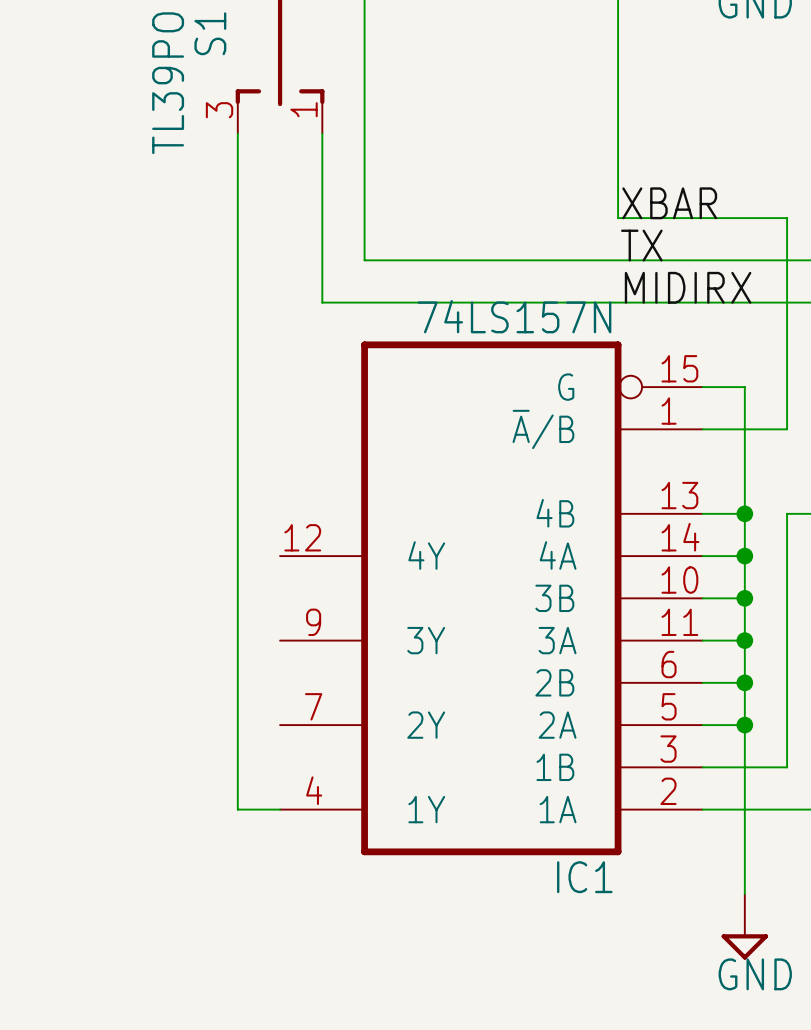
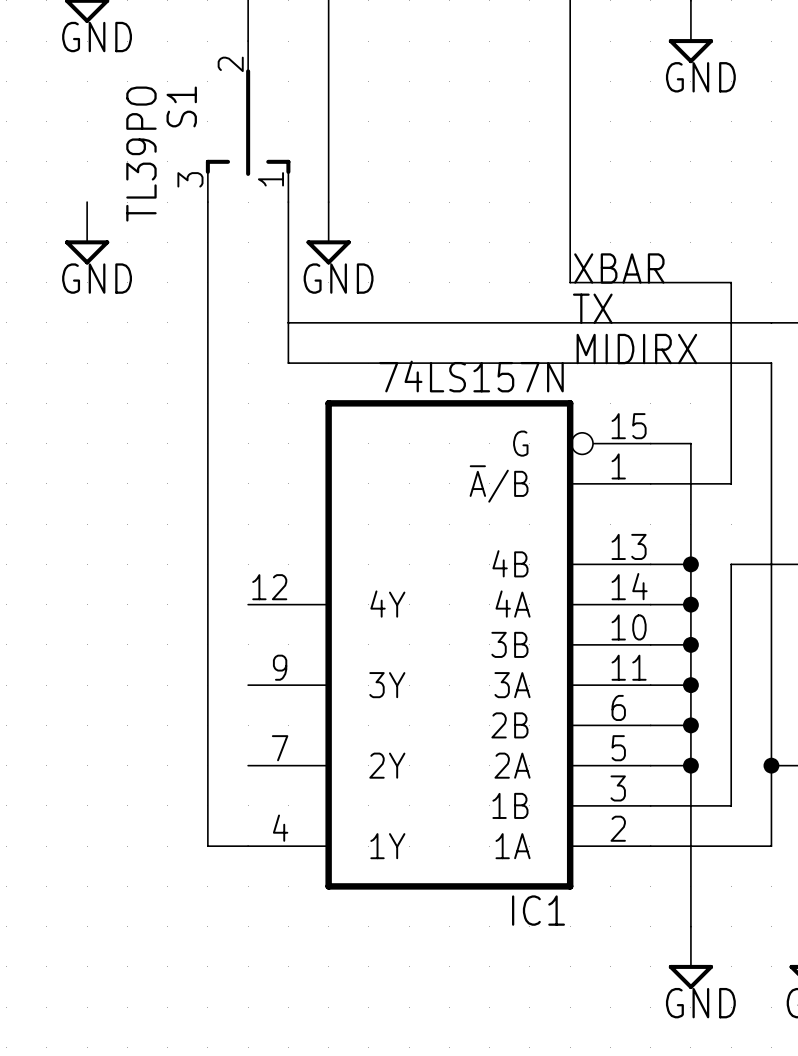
wire: (364, 133) (364, 260) -> (288, 322) (328, 322)
power symbol: none -> GND (87, 233)
power symbol: none -> GND (328, 233)

